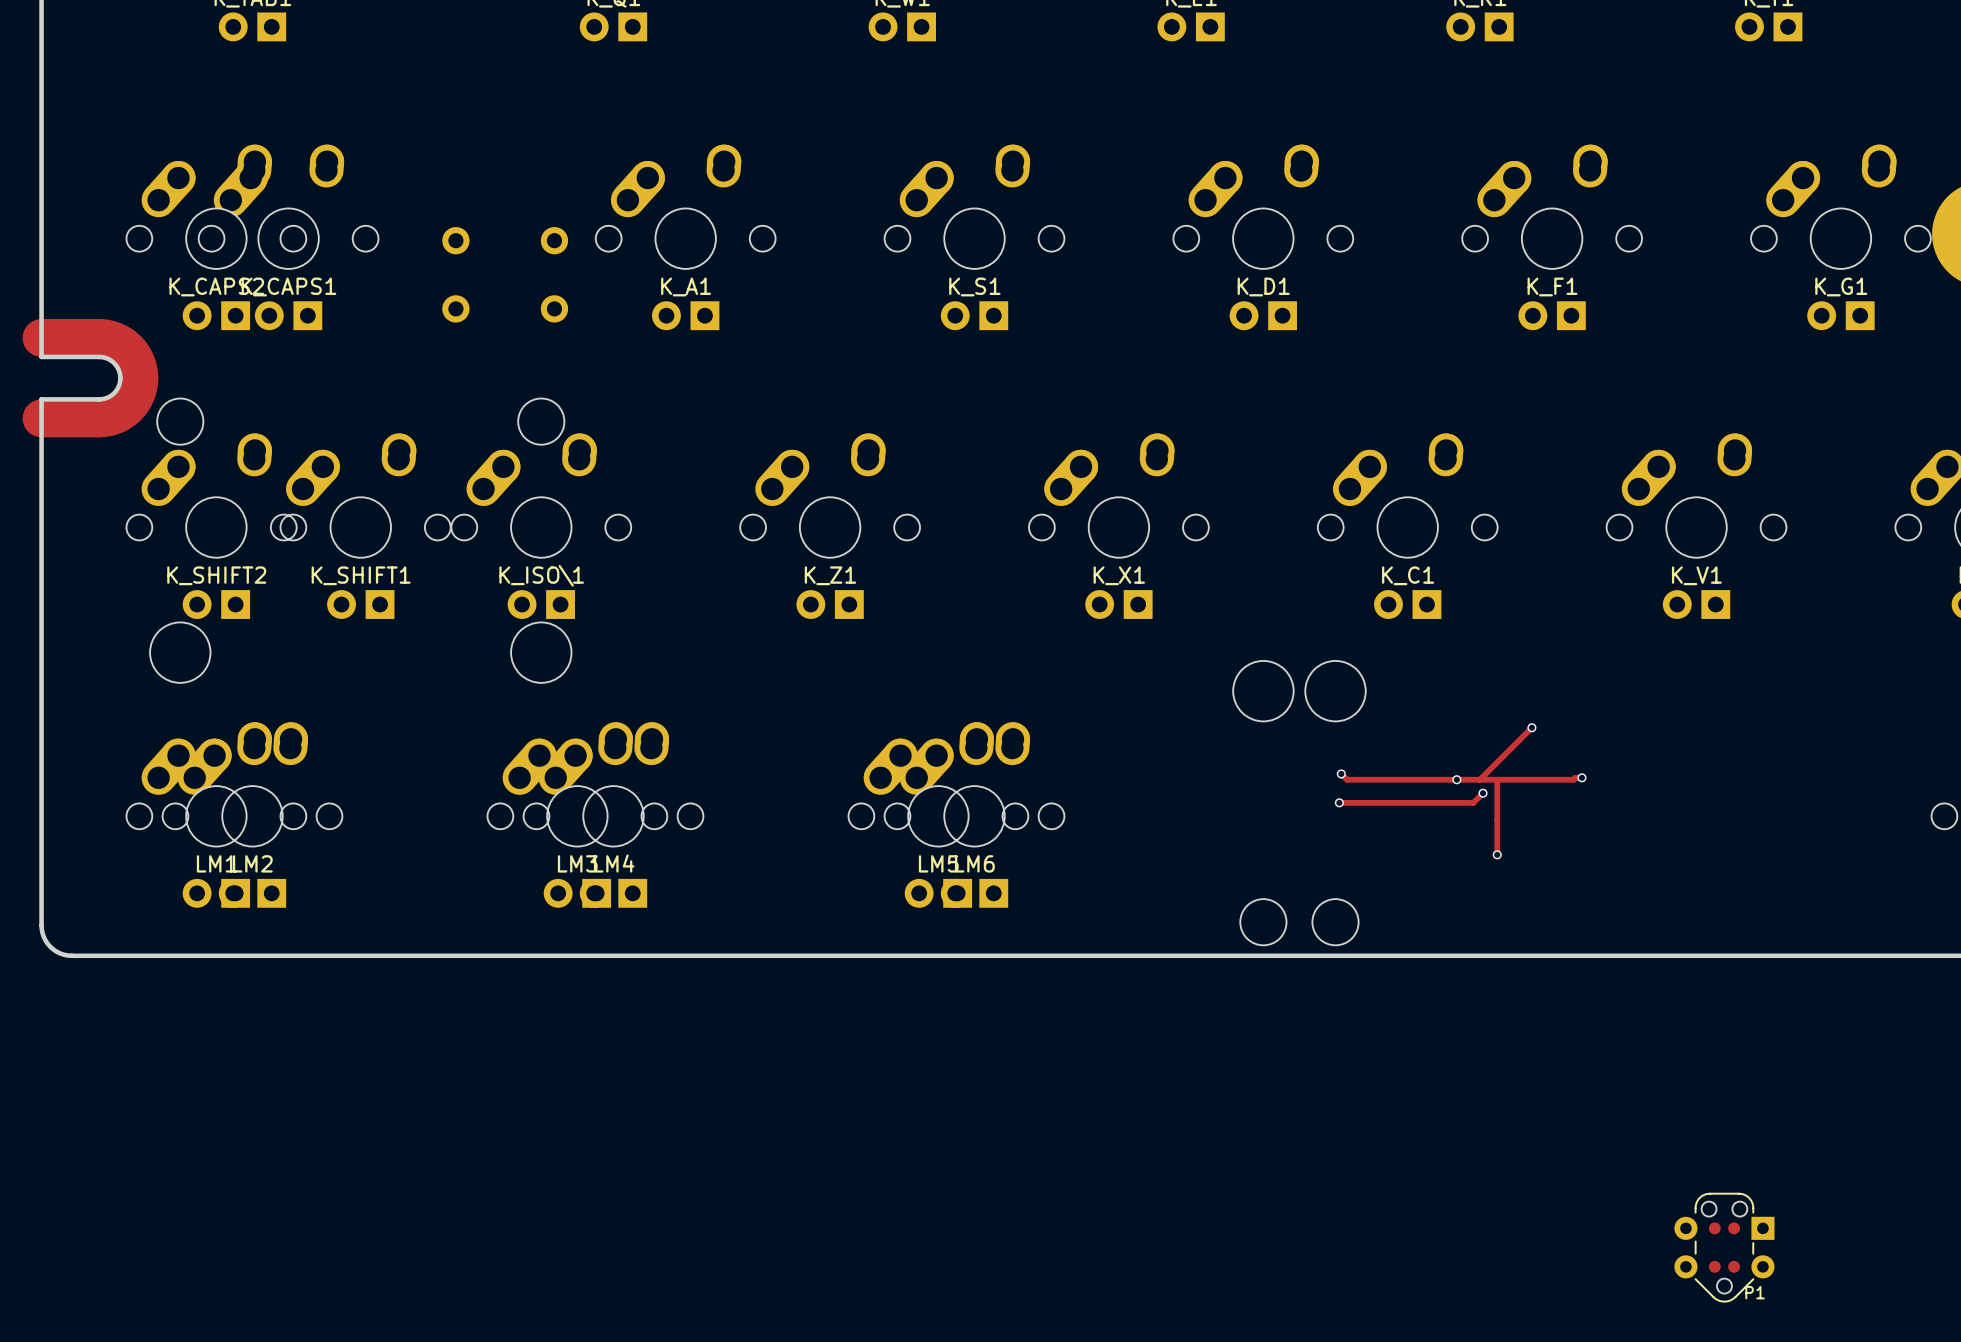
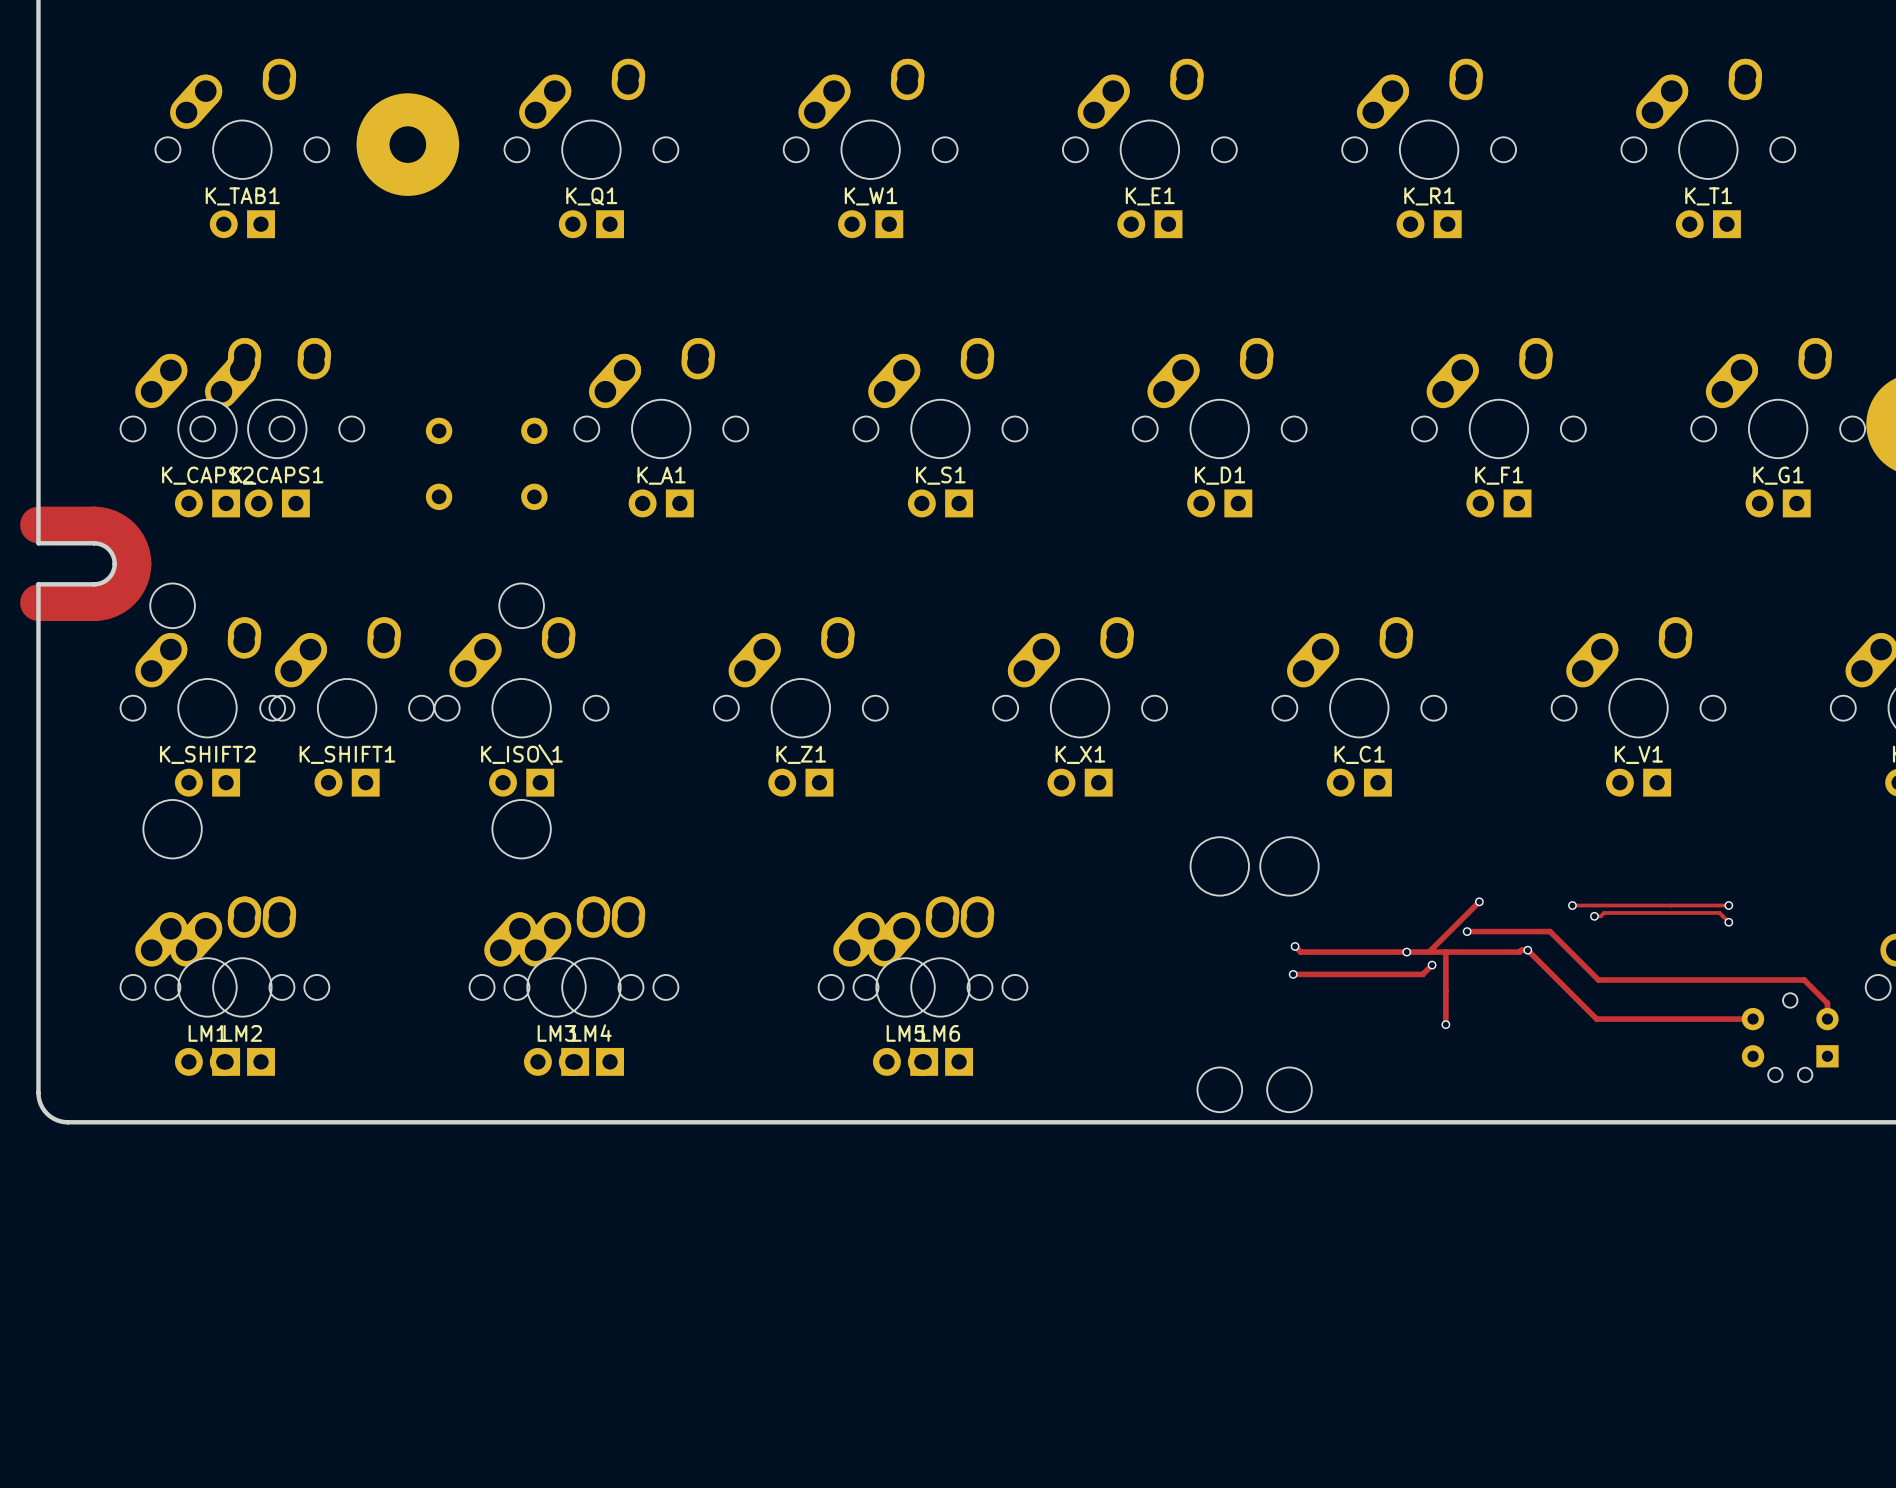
track: none -> (1572, 905) (1728, 905)
via: none -> (1572, 905)
via: none -> (1728, 905)
track: none -> (1594, 916) (1600, 916) (1604, 912) (1719, 912) (1728, 922)
via: none -> (1594, 916)
via: none -> (1728, 922)
track: none -> (1467, 931) (1550, 931) (1598, 979) (1804, 979) (1827, 1003) (1827, 1019)
via: none -> (1467, 931)
track: none -> (1527, 950) (1596, 1019) (1753, 1019)
part: none -> (1790, 1037)
P1: (1724, 1247) -> none

